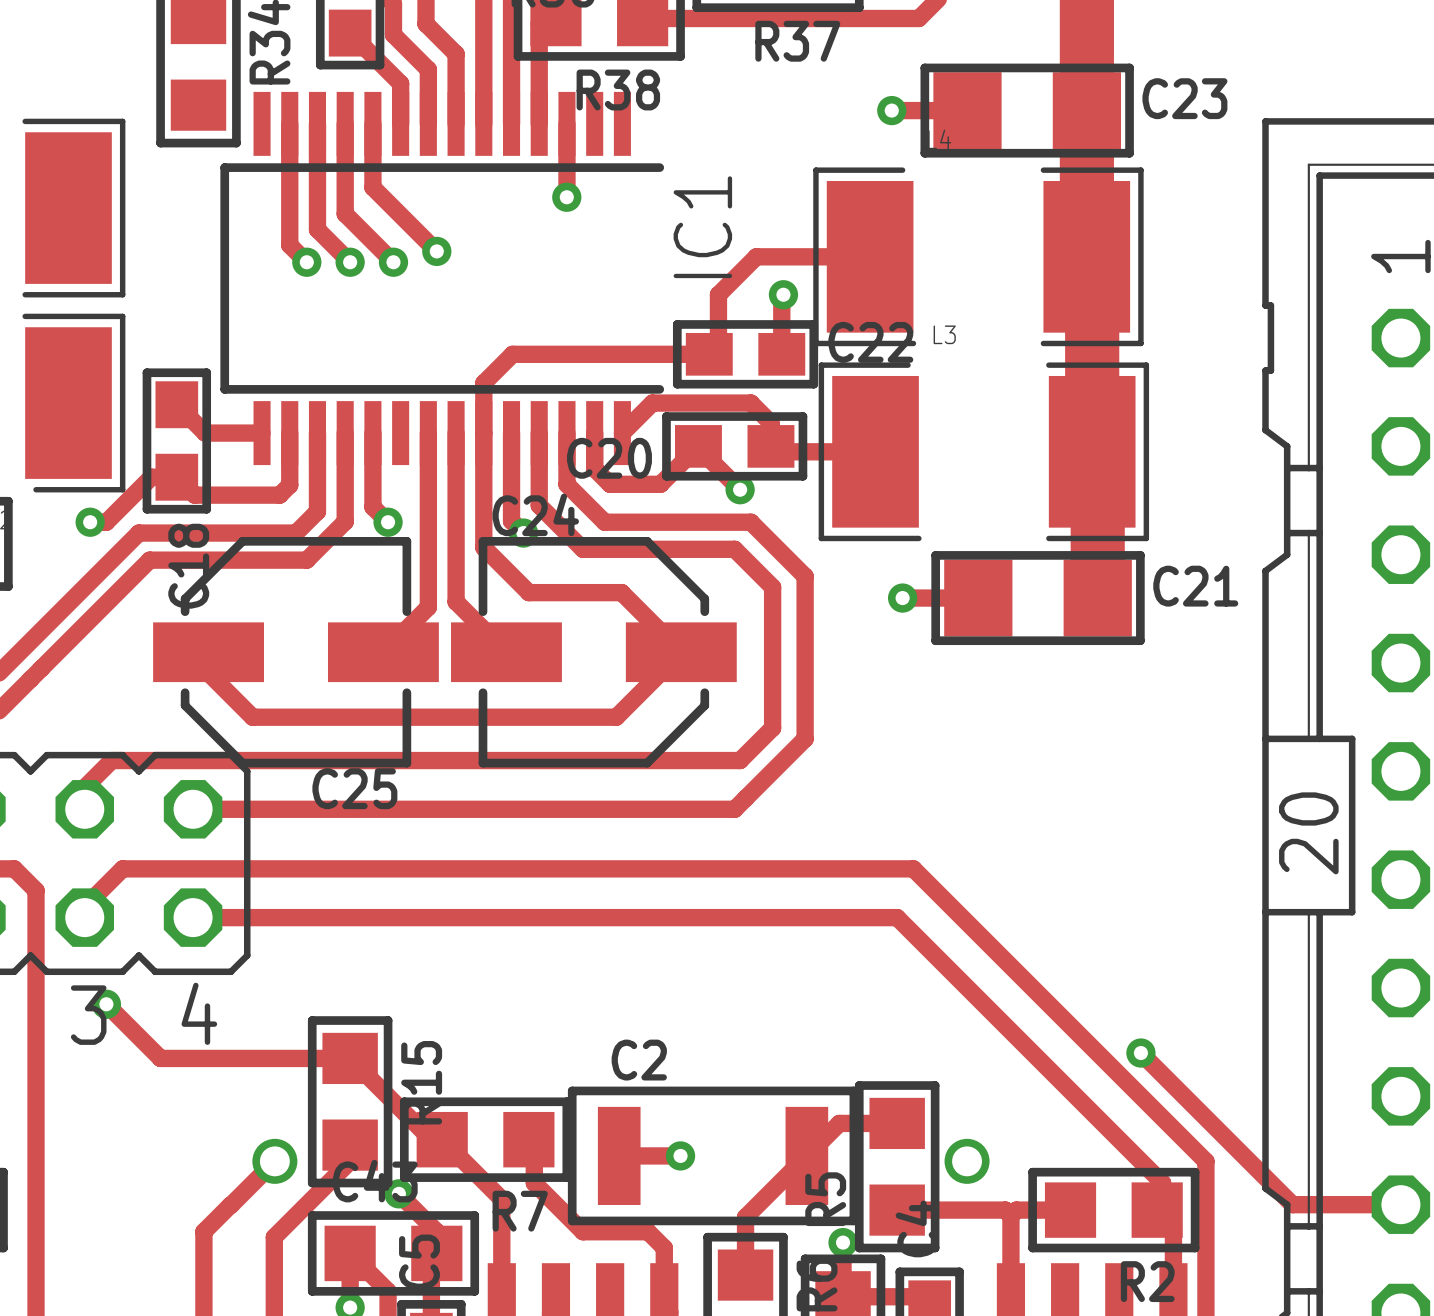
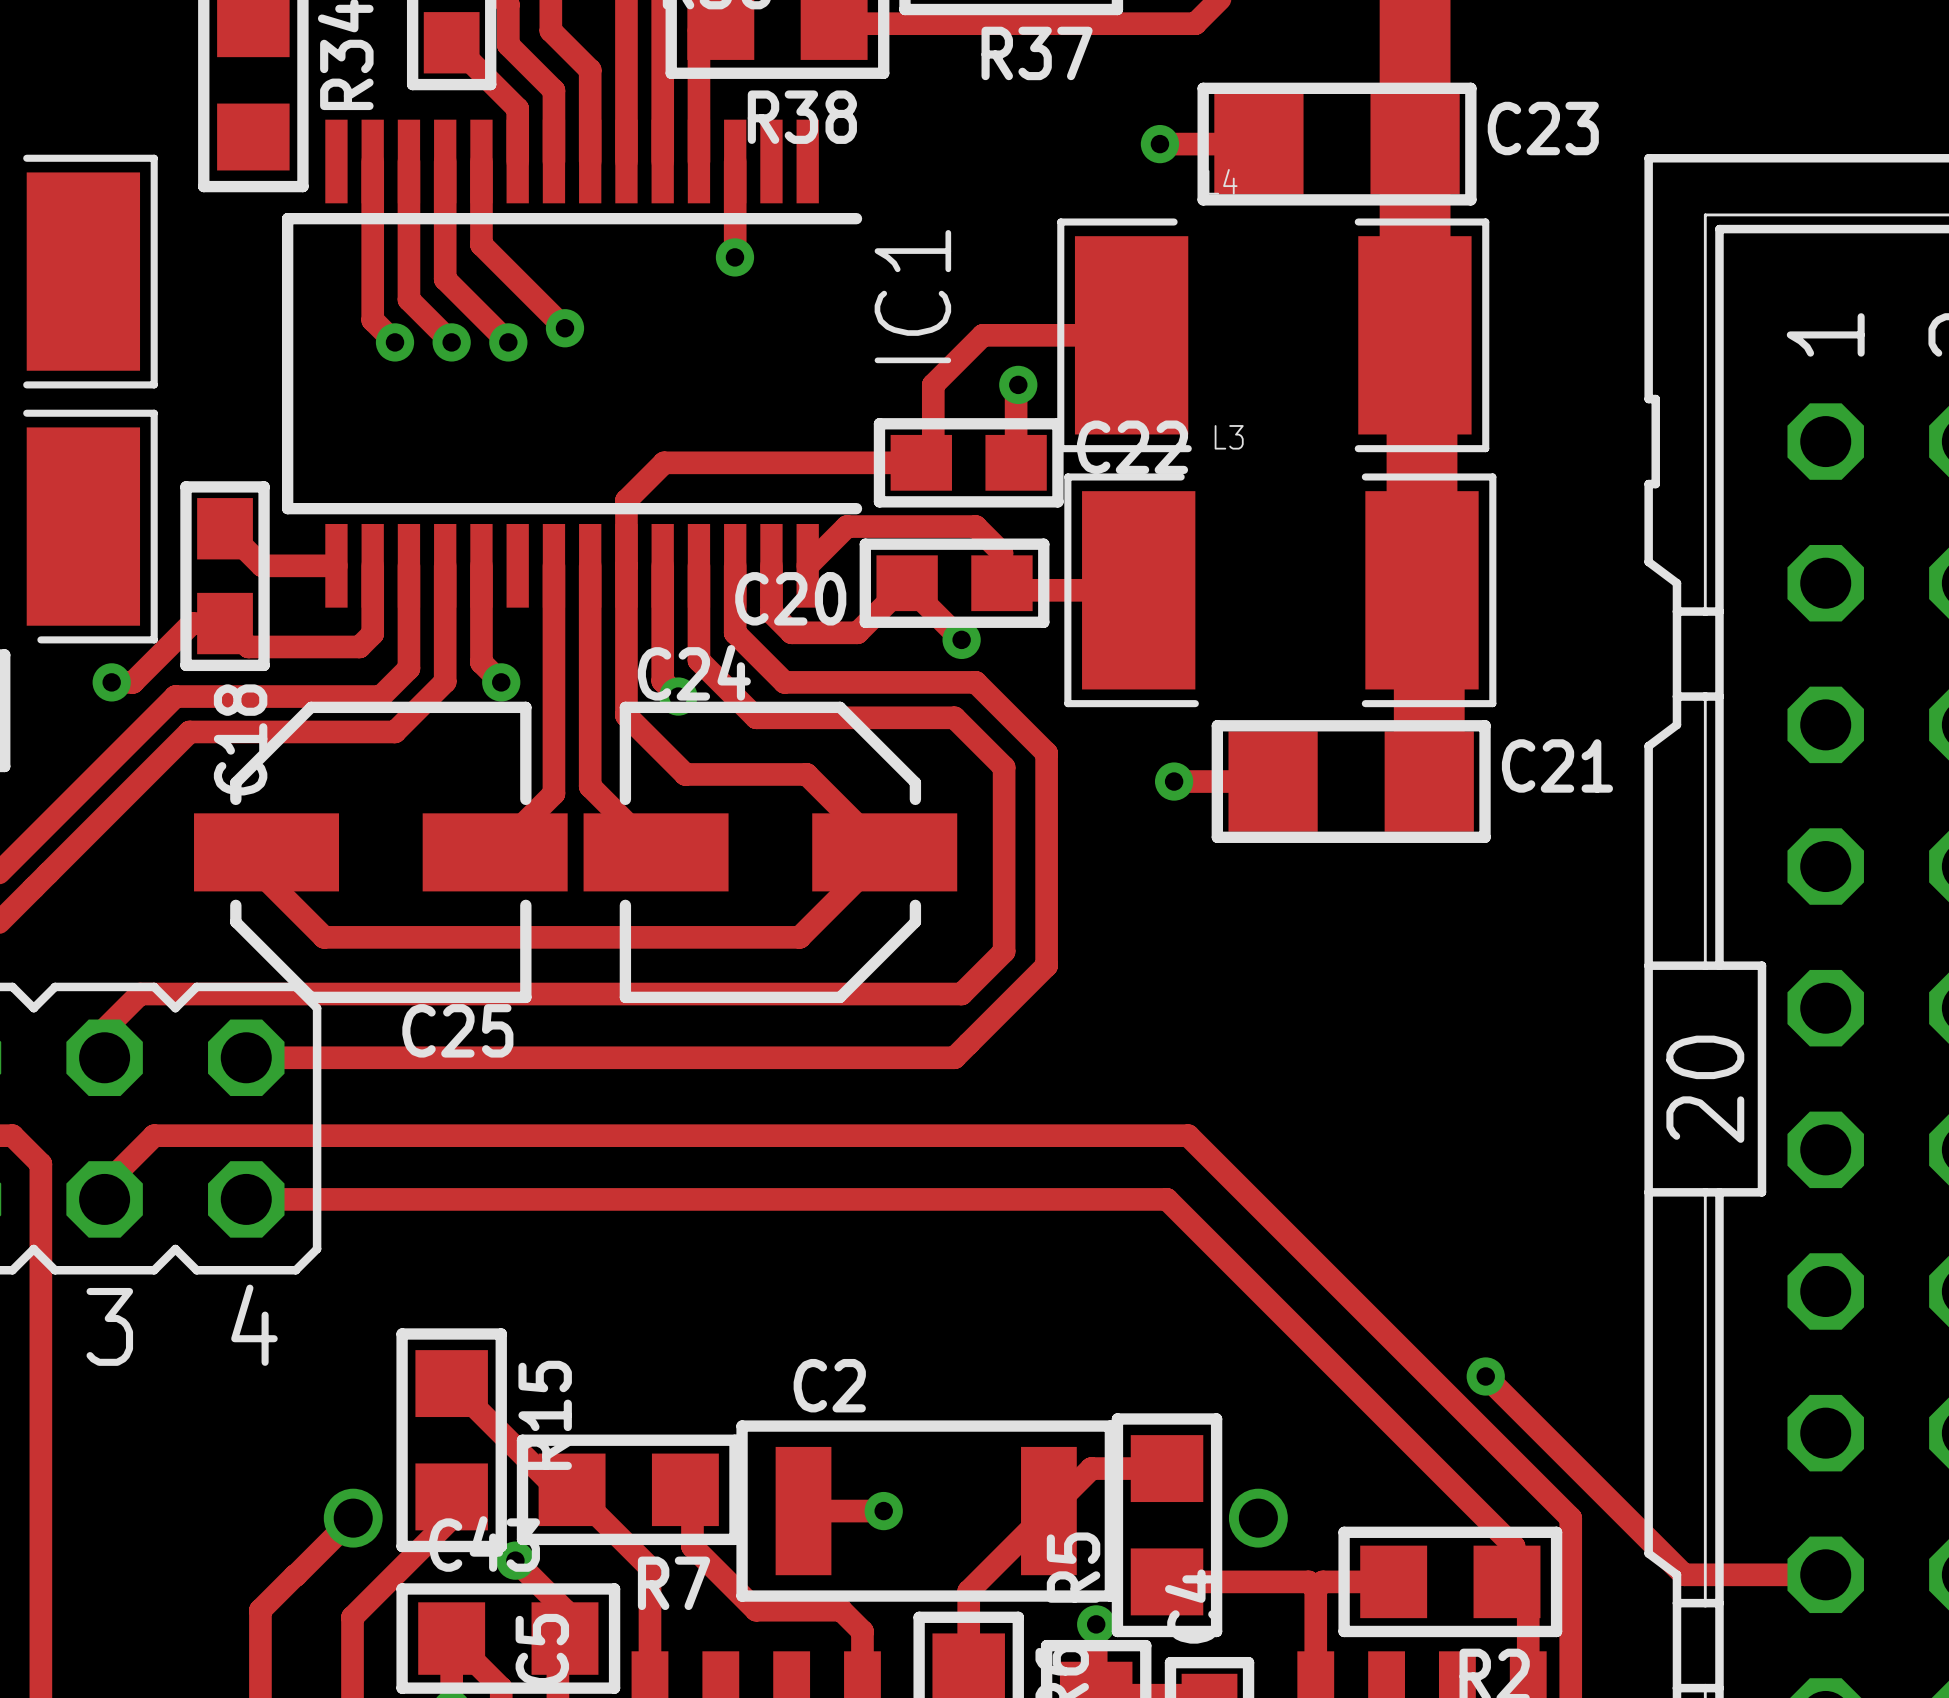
track: (106, 1004) (160, 1058) (350, 1058) -> none
via: (106, 1004) -> none

